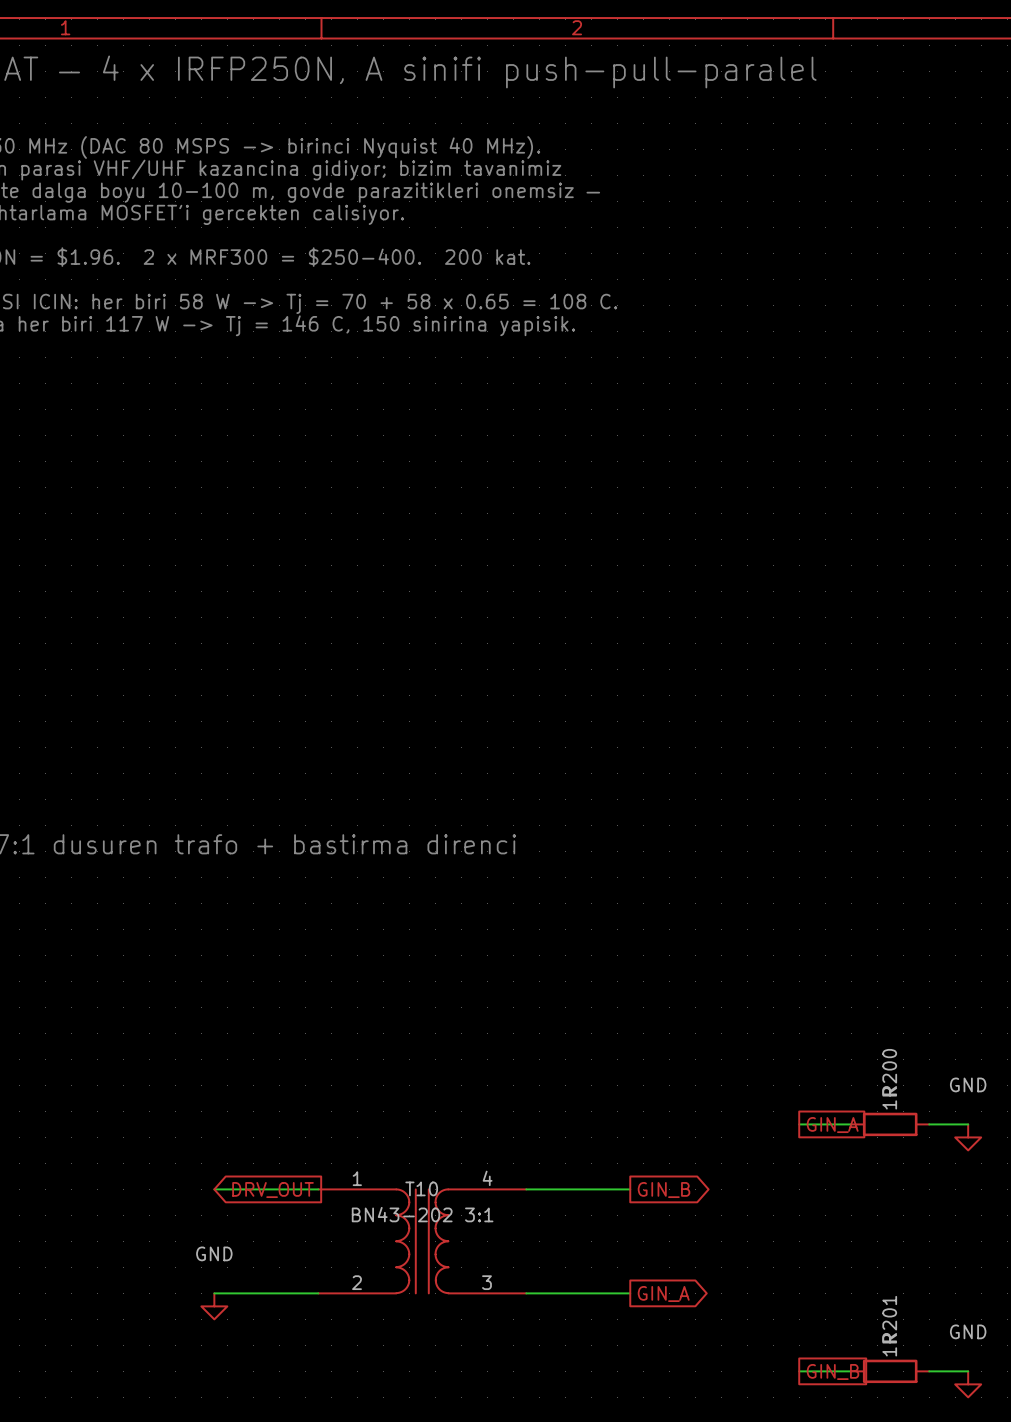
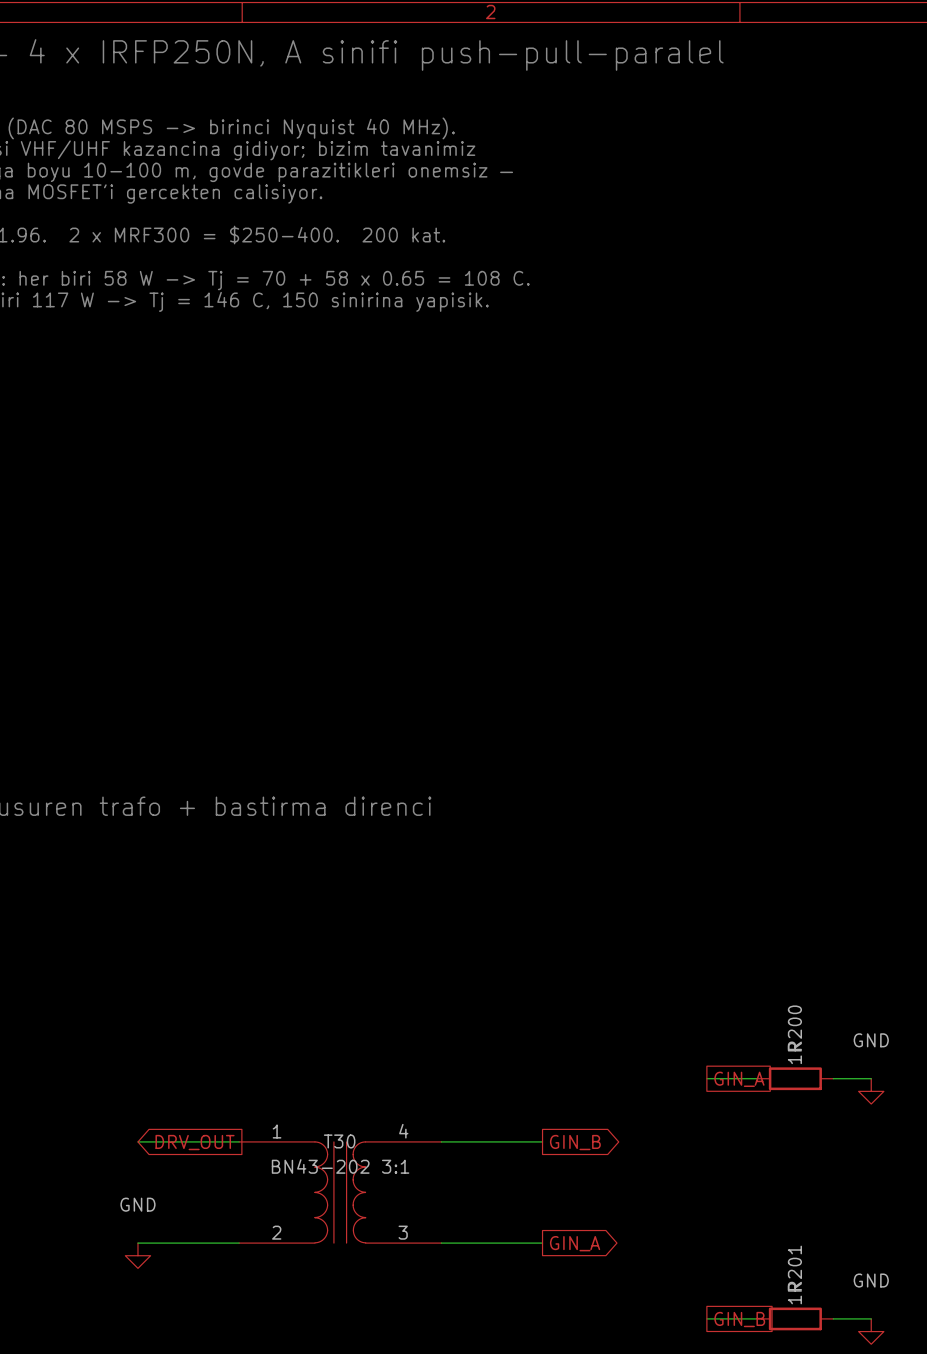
T10 name: T10 (421, 1188) -> T30 (339, 1141)

